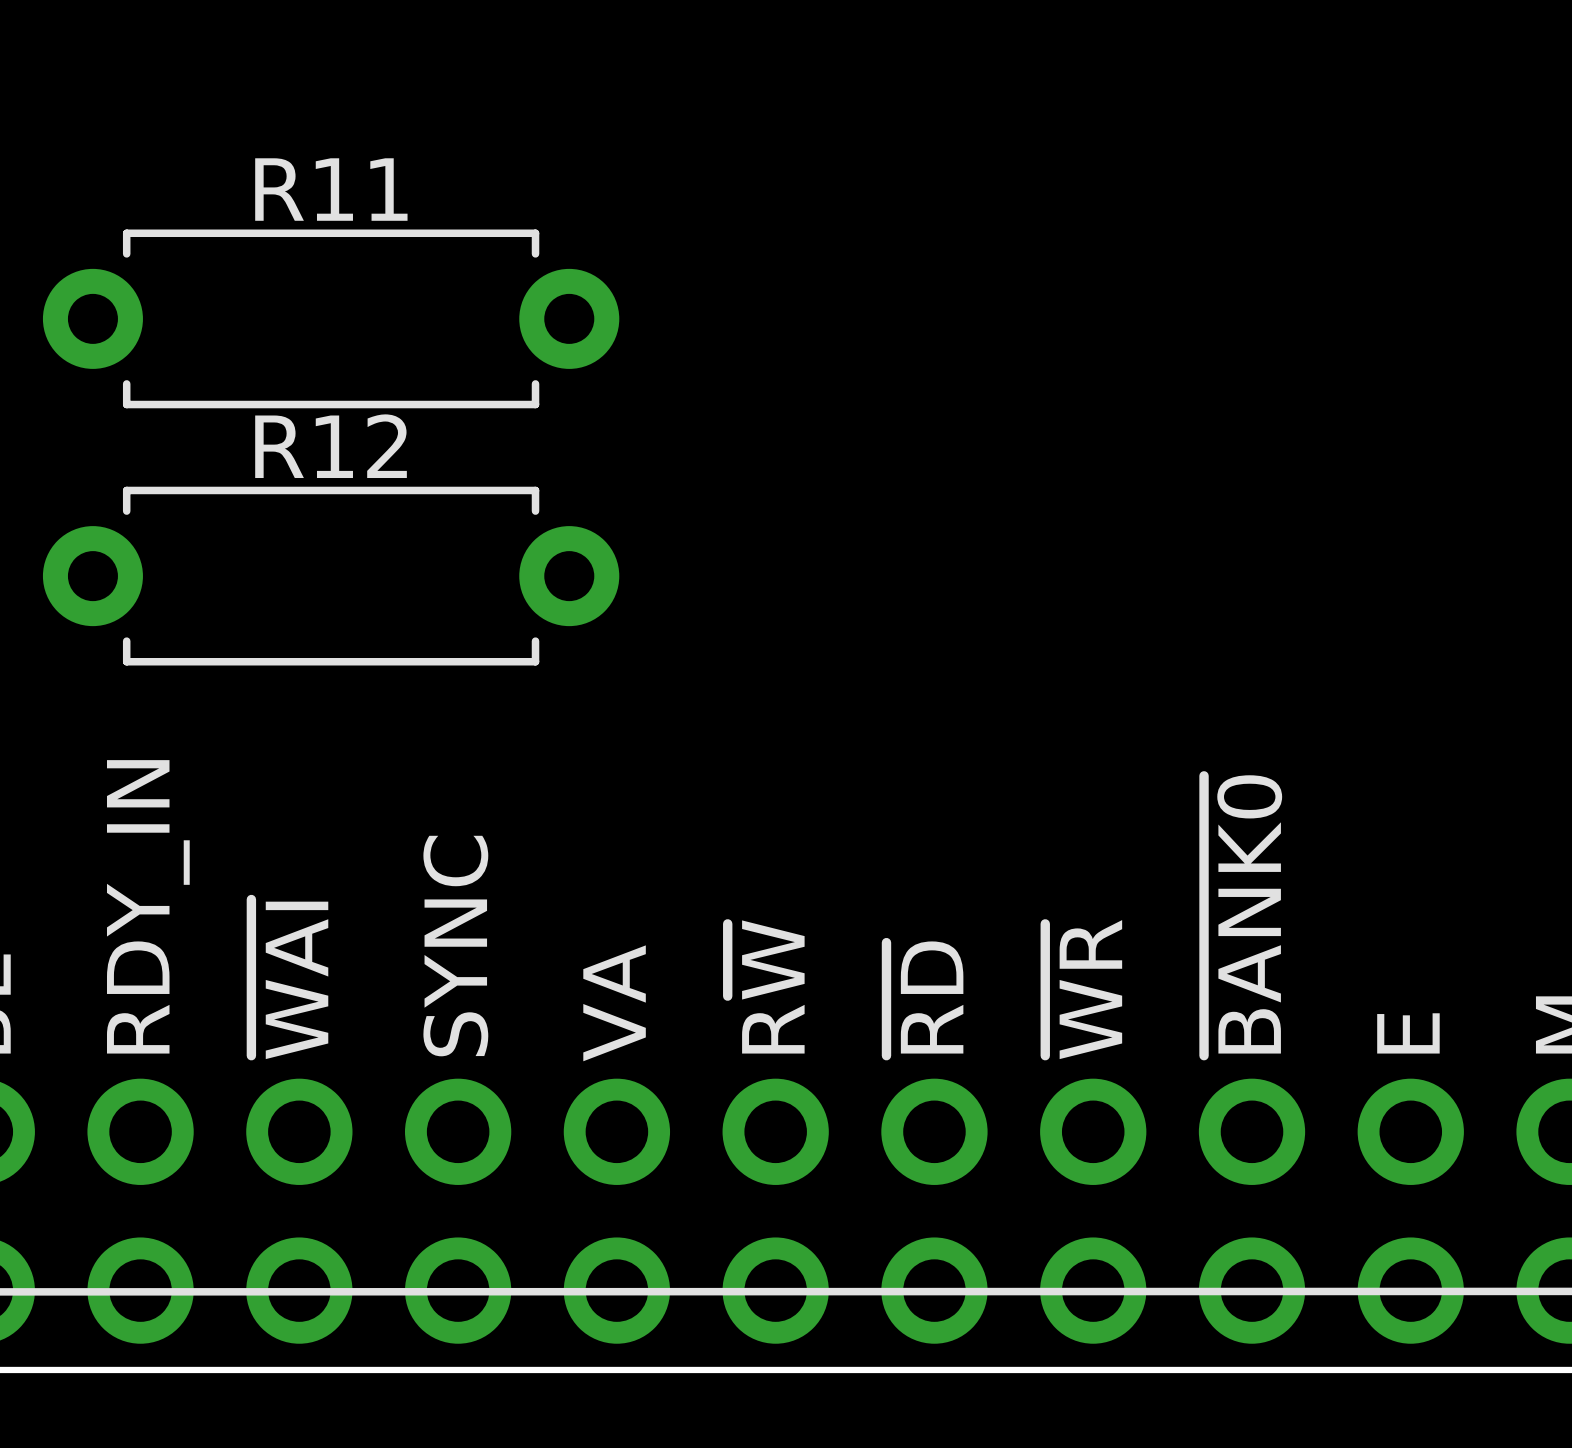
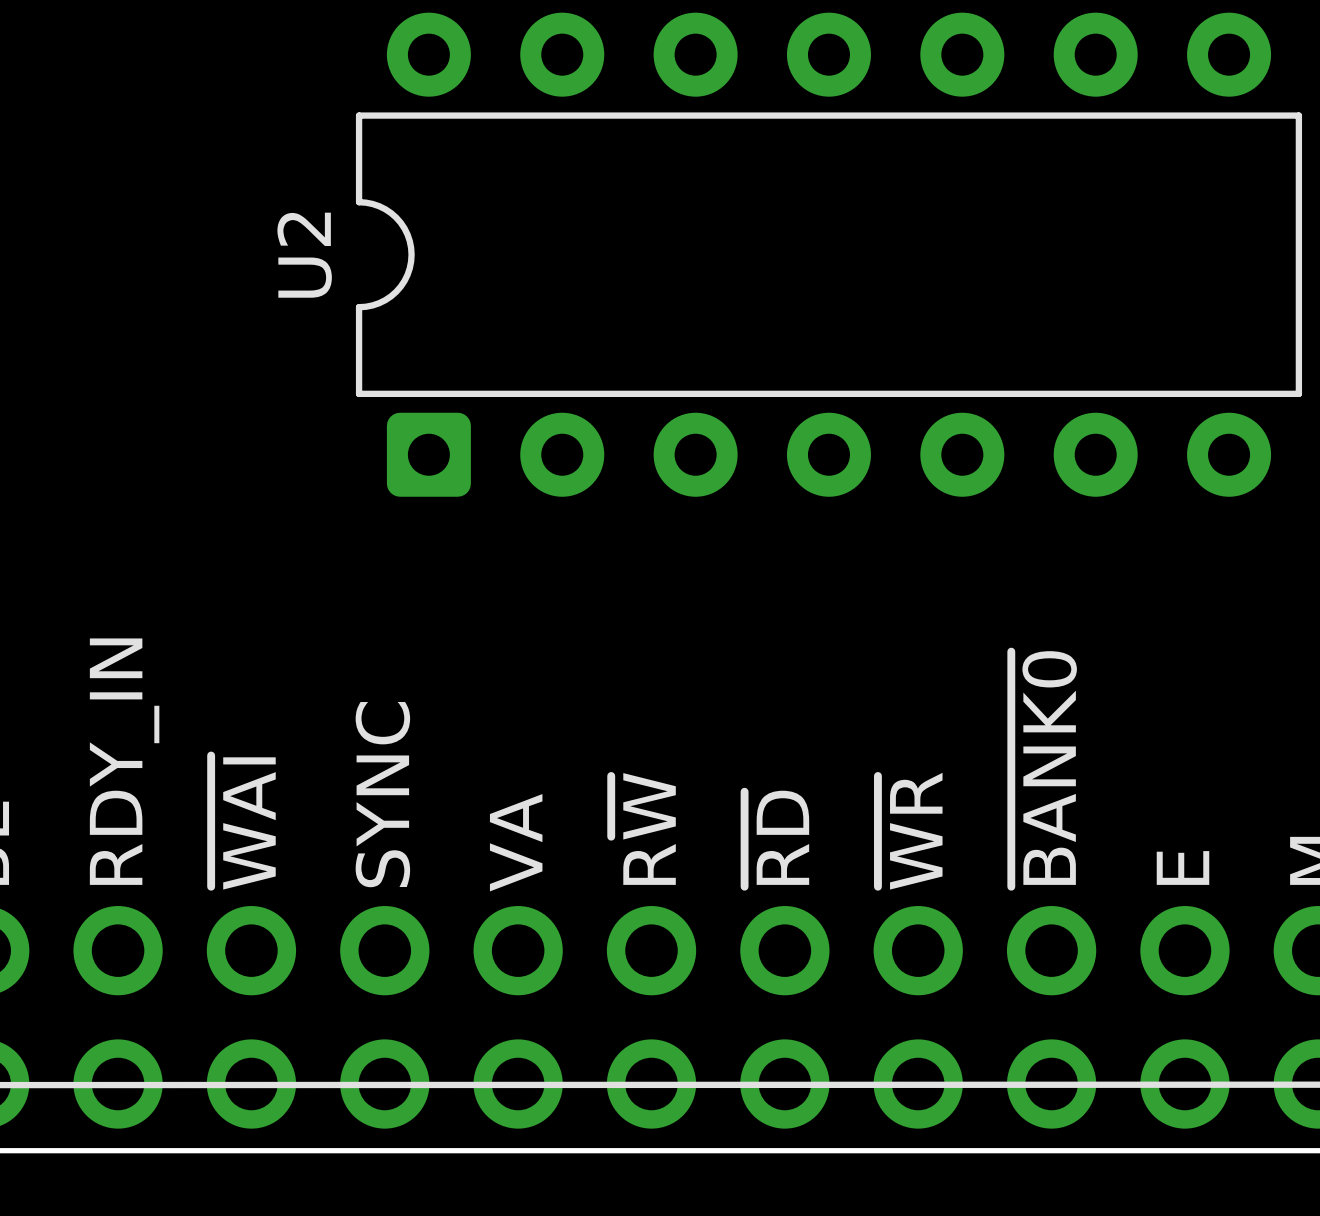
U2: none -> (828, 254)
R11: (331, 318) -> none
R12: (331, 576) -> none

